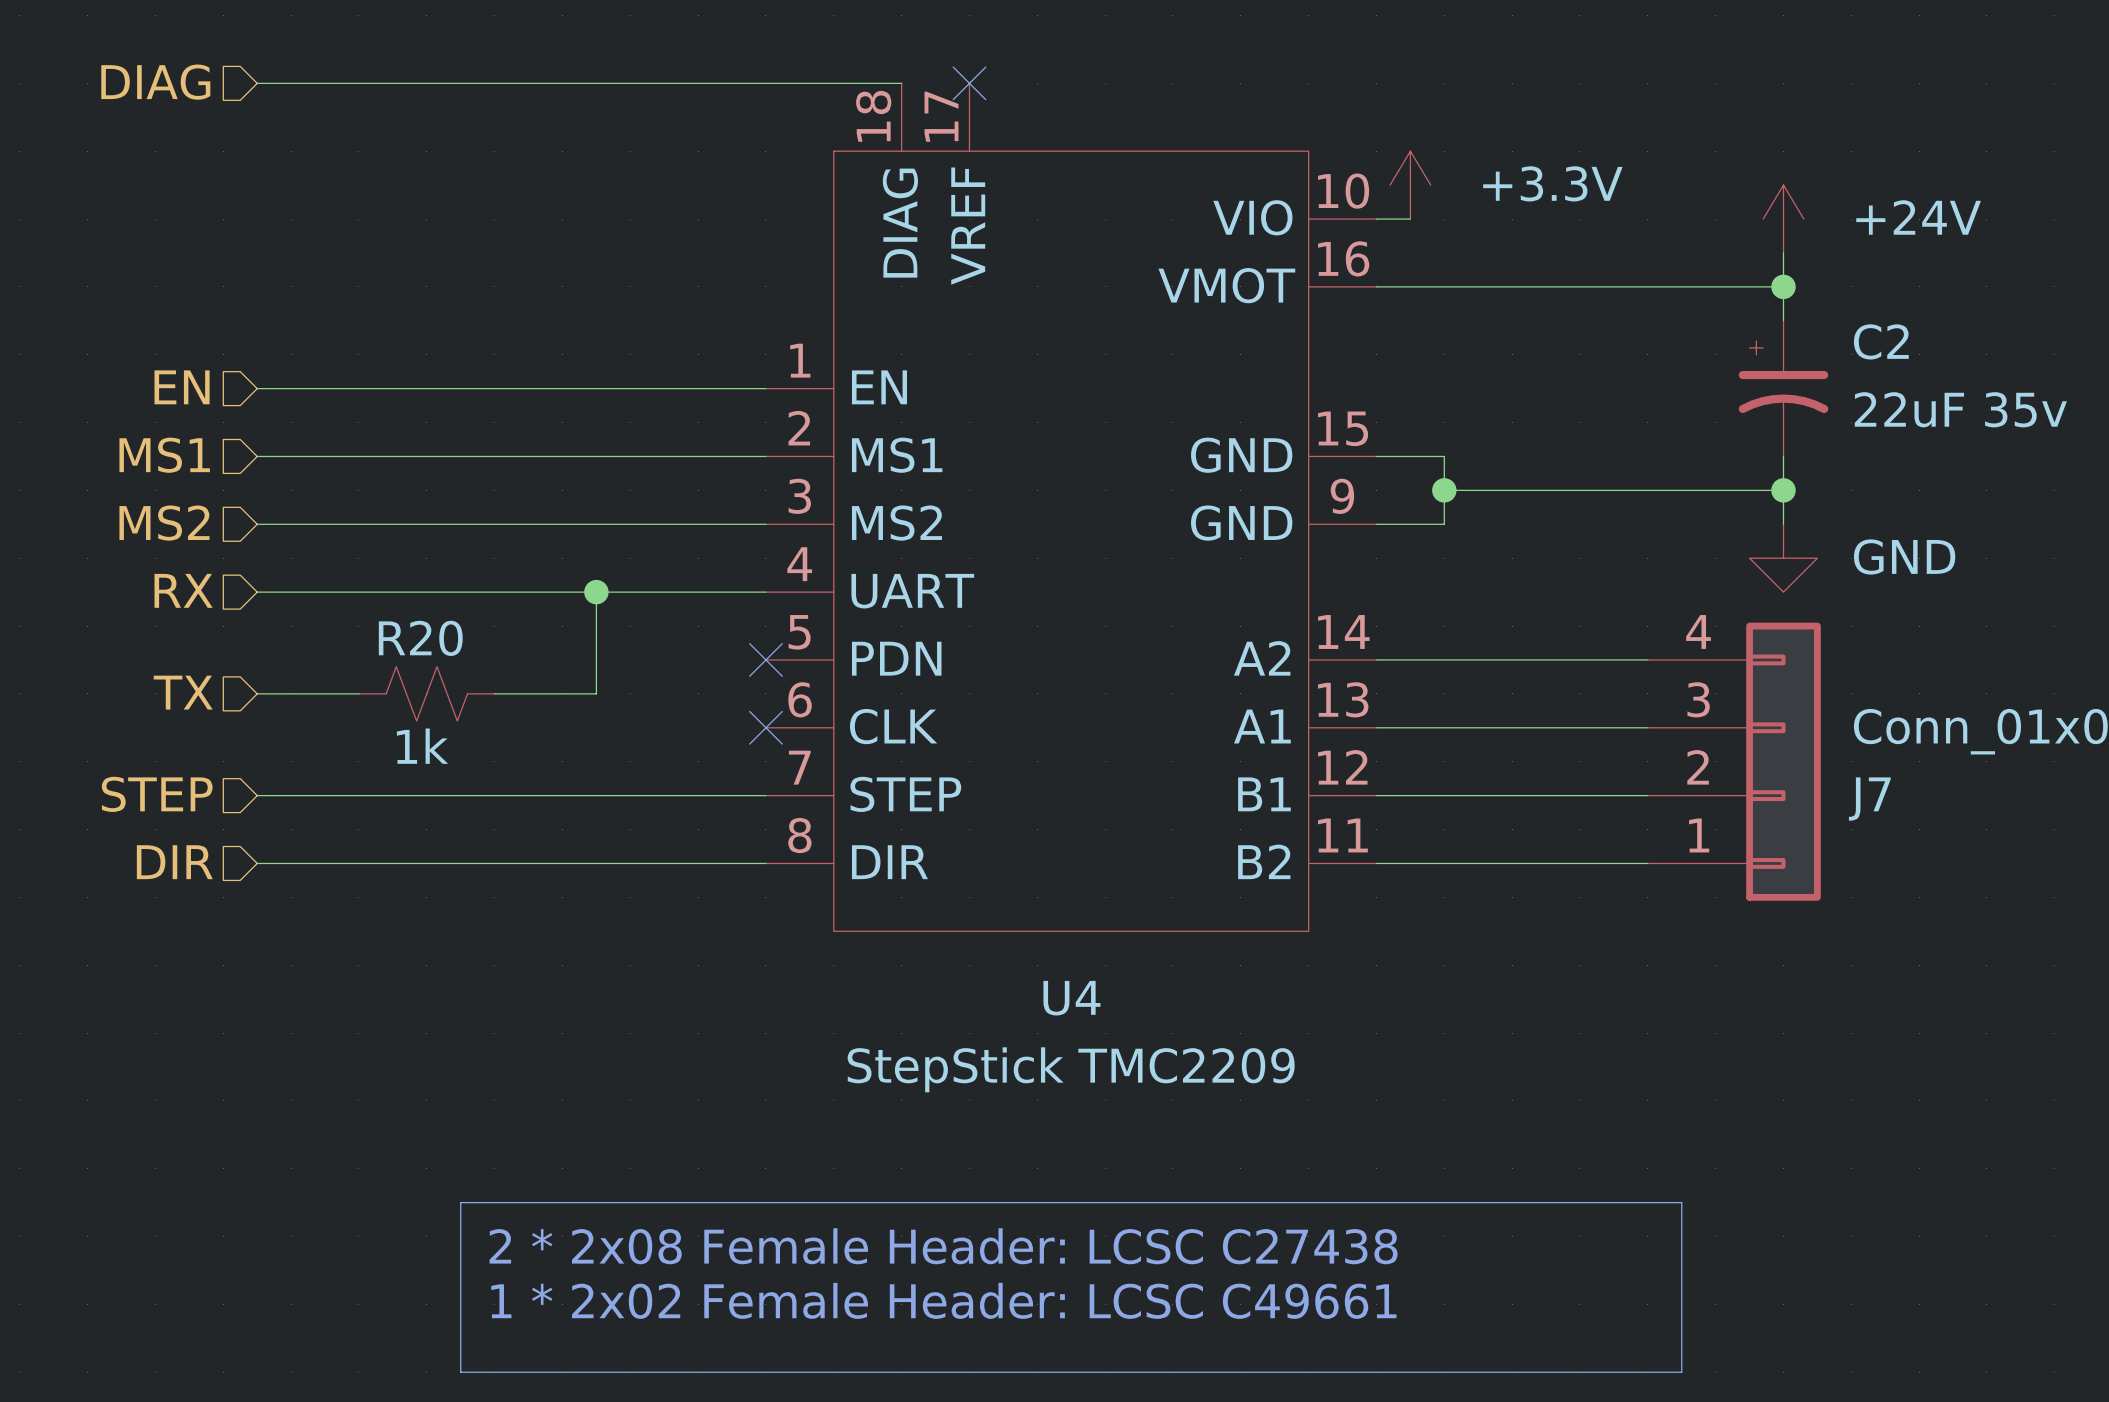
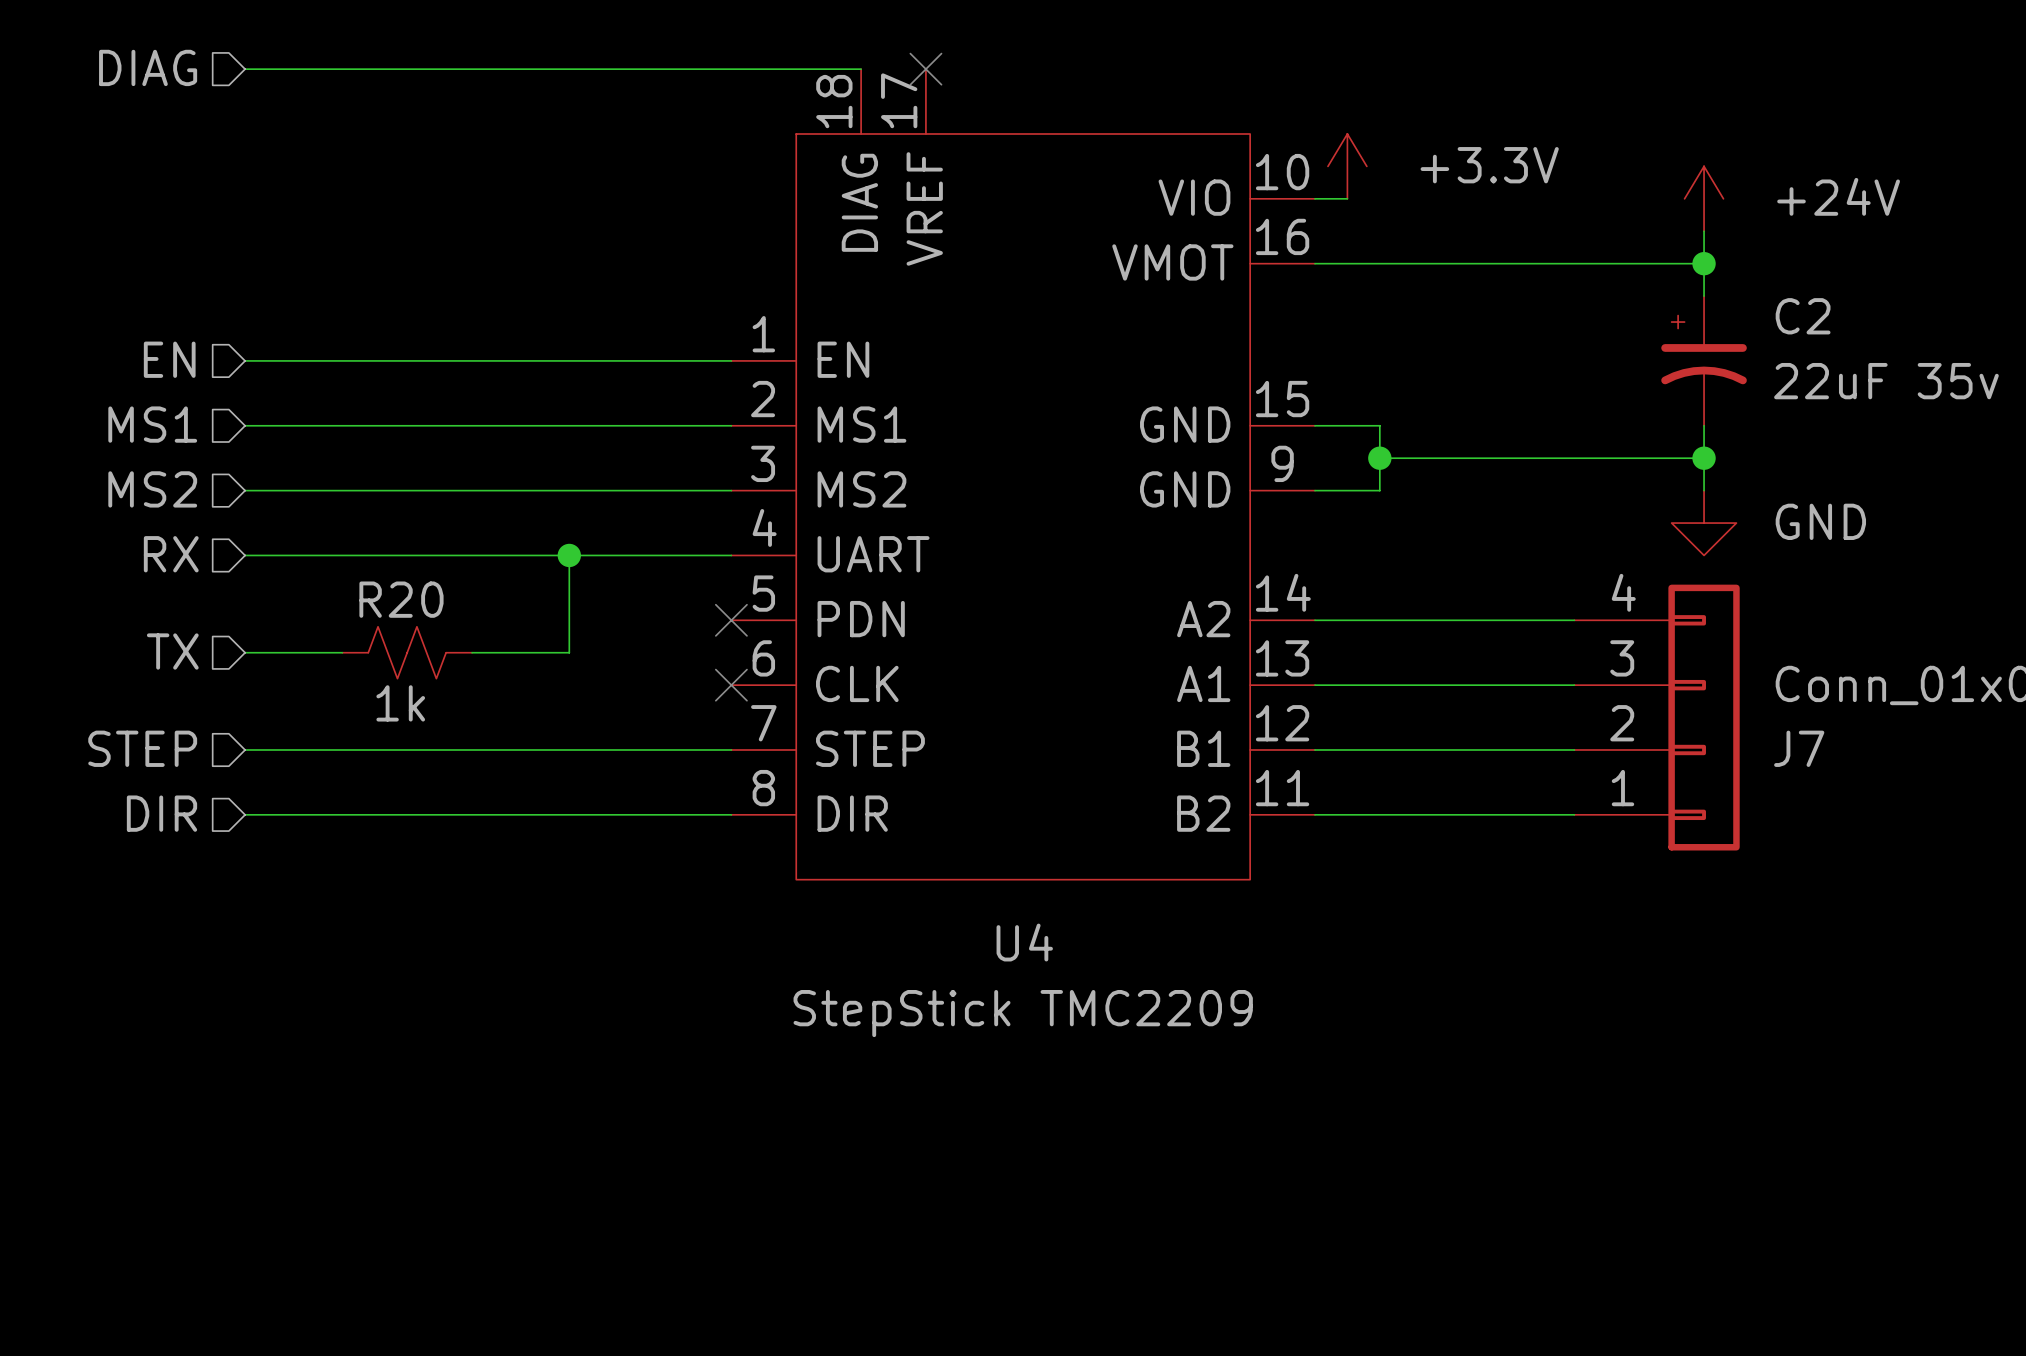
line: (460, 1202) (1681, 1202) (1681, 1372) (460, 1372) (460, 1202) -> none
text: 2 * 2x08 Female Header: LCSC C27438 (943, 1246) -> none
text: 1 * 2x02 Female Header: LCSC C49661 (943, 1300) -> none

